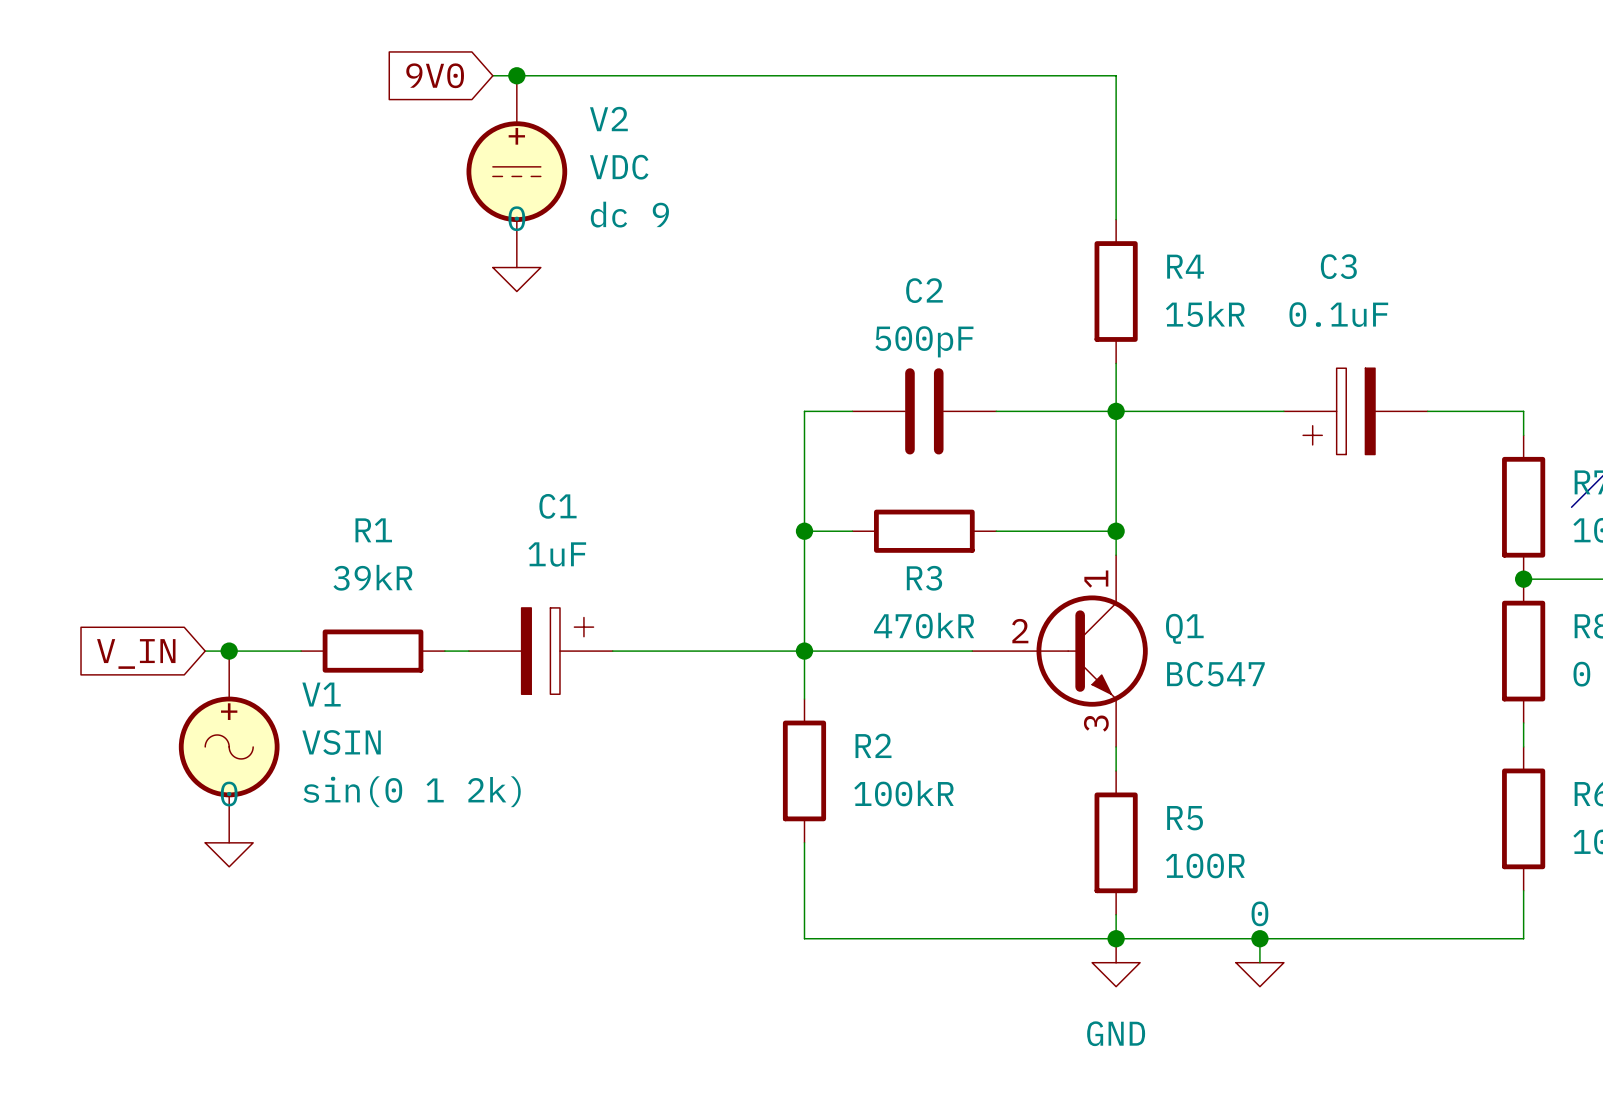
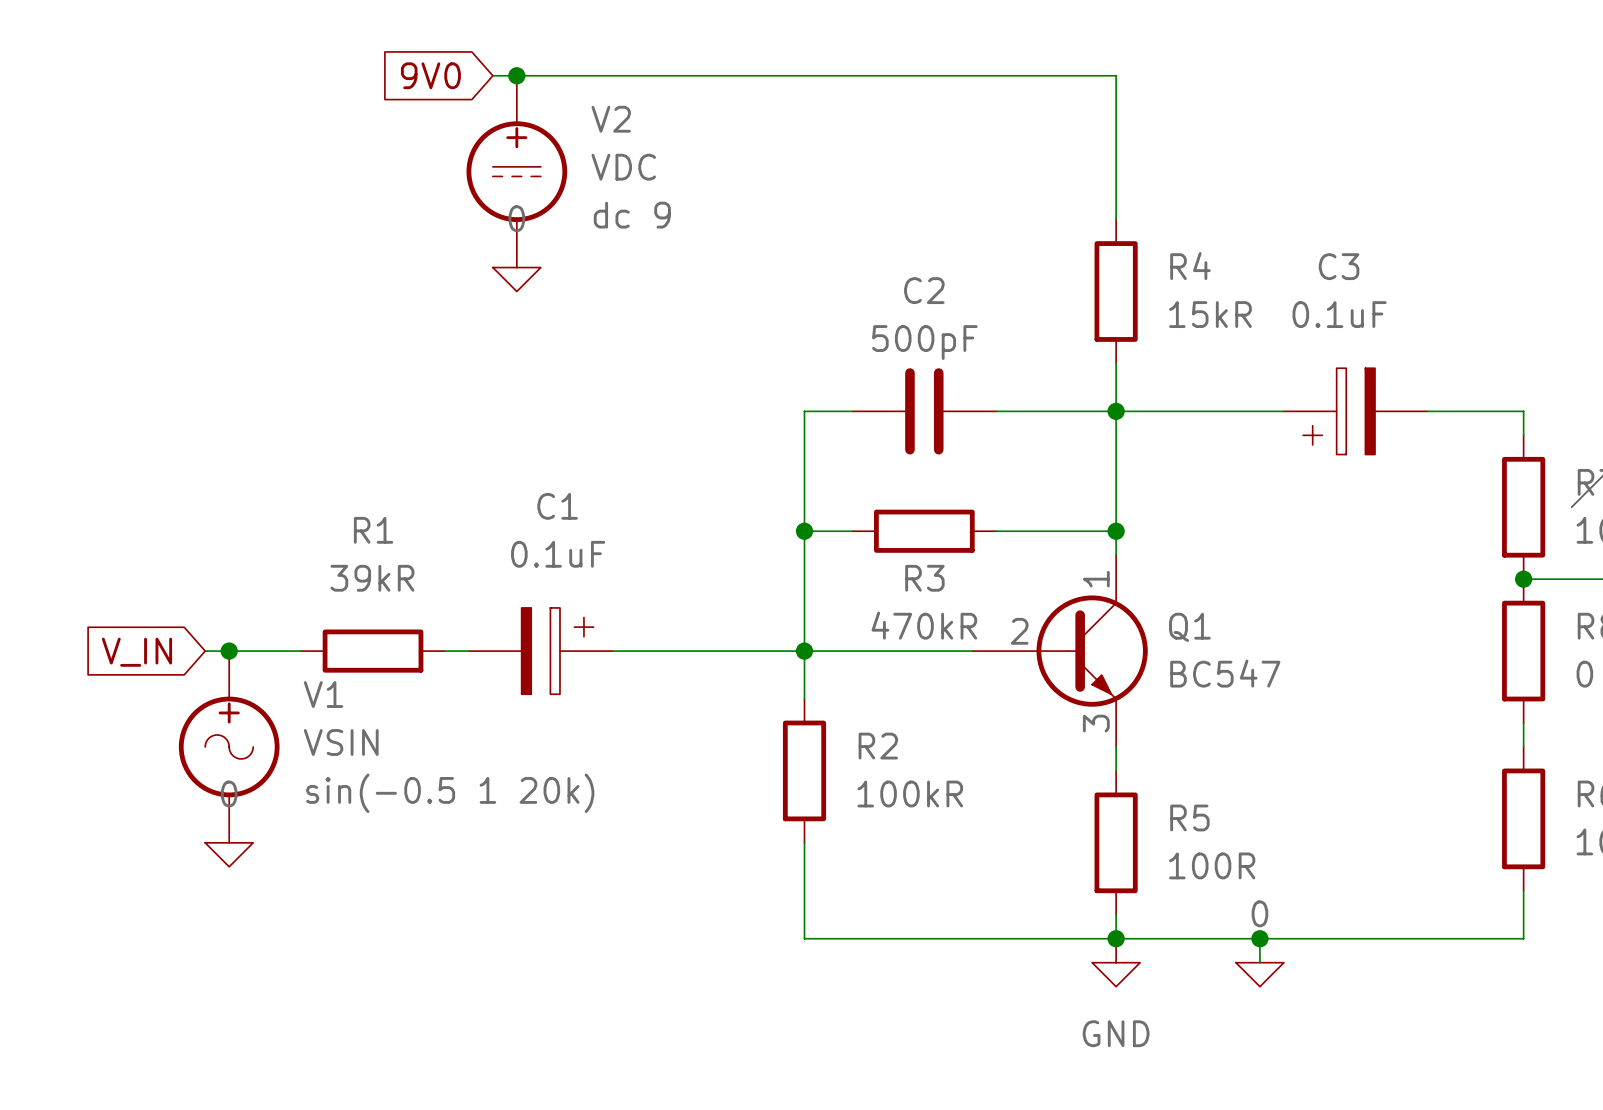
C1 value: 1uF (557, 554) -> 0.1uF (558, 554)
V1 text: sin(0 1 2k) (412, 791) -> sin(-0.5 1 20k) (450, 793)

